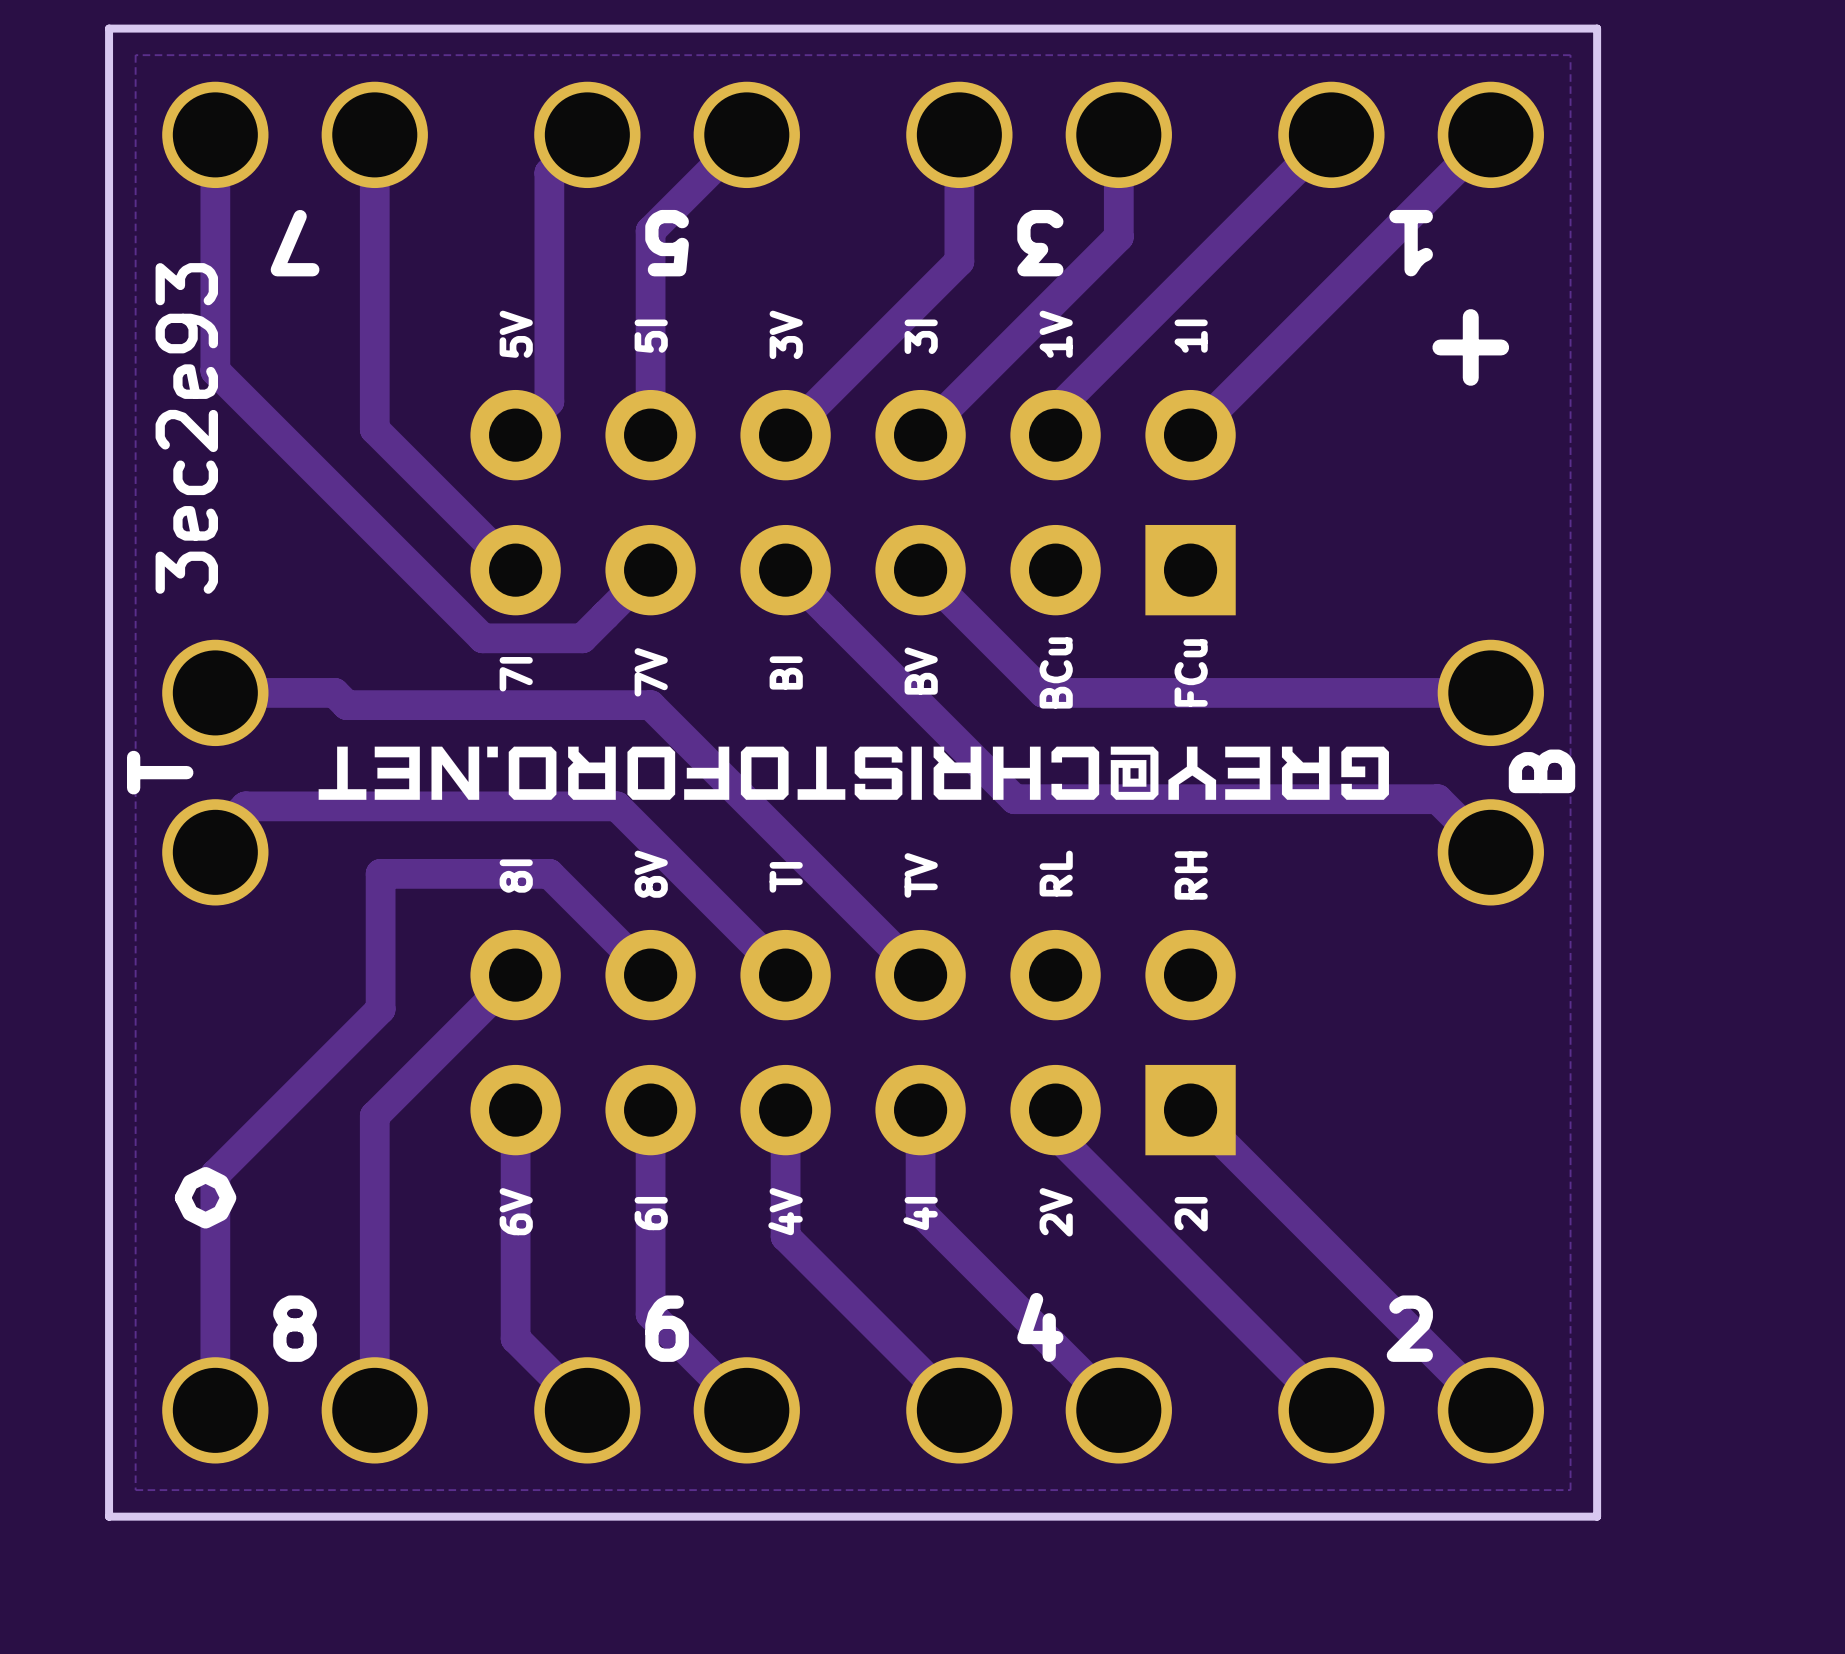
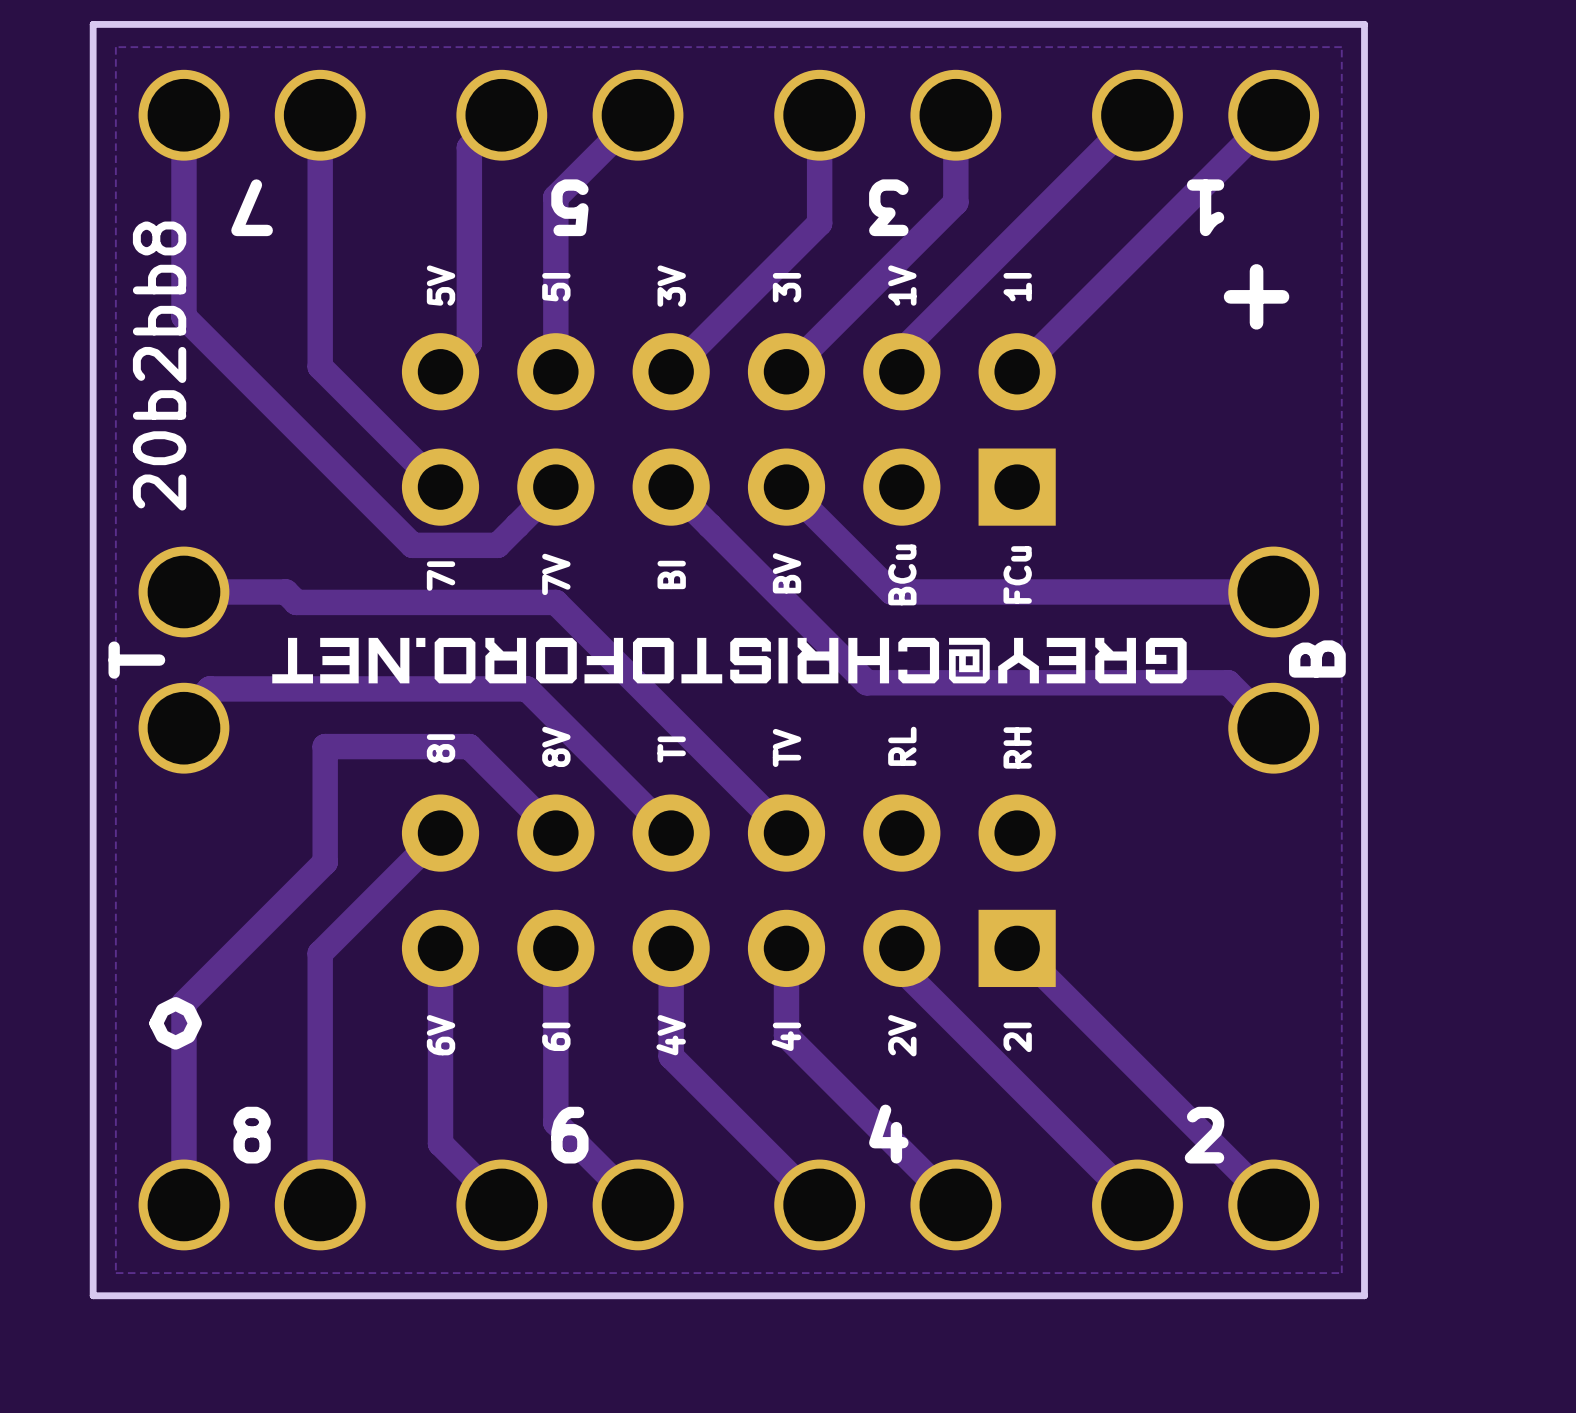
text: 3ec2e93 (186, 428) -> 20b2bb8 (159, 366)

